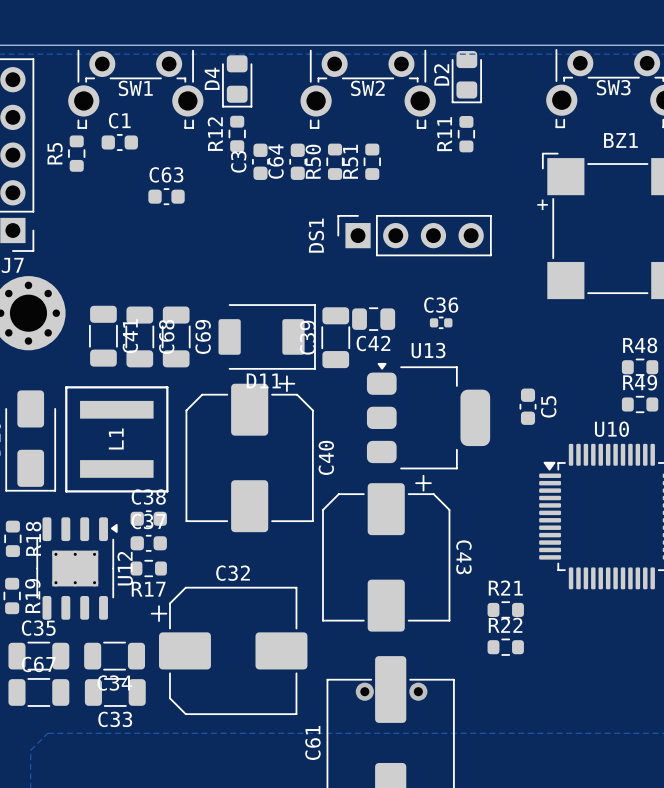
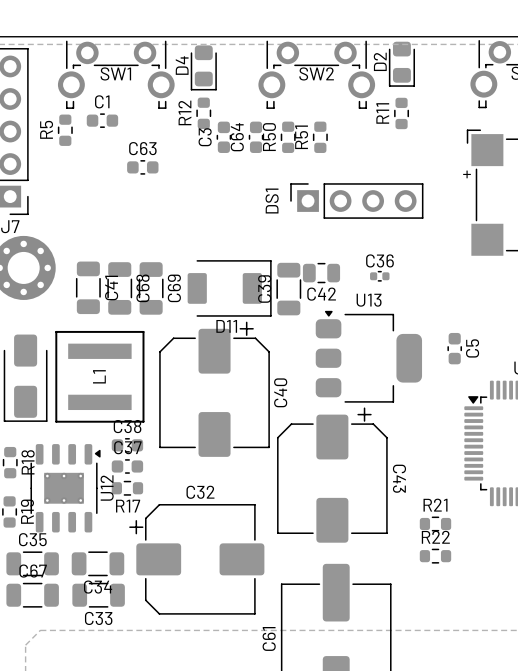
via: (364, 691) -> none
via: (418, 691) -> none

